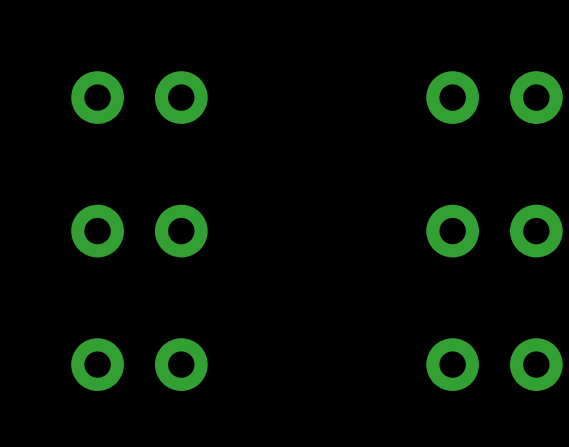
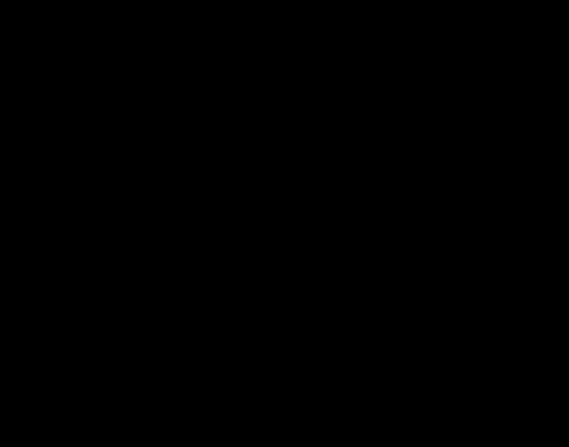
part: (139, 97) -> none
part: (494, 97) -> none
part: (139, 231) -> none
part: (494, 231) -> none
part: (139, 364) -> none
part: (494, 364) -> none

